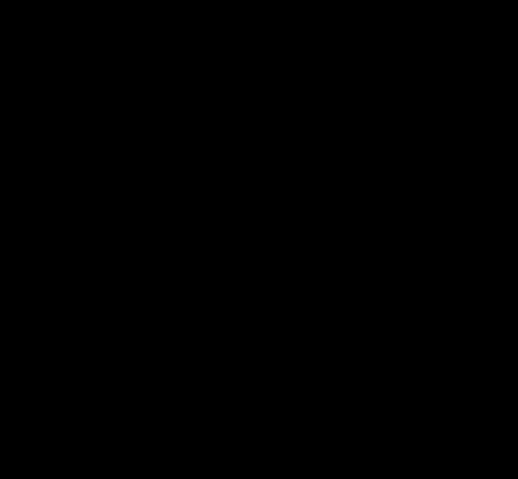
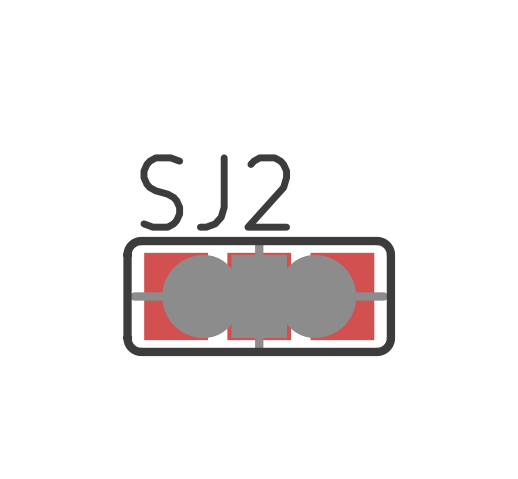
SJ2: none -> (259, 296)

